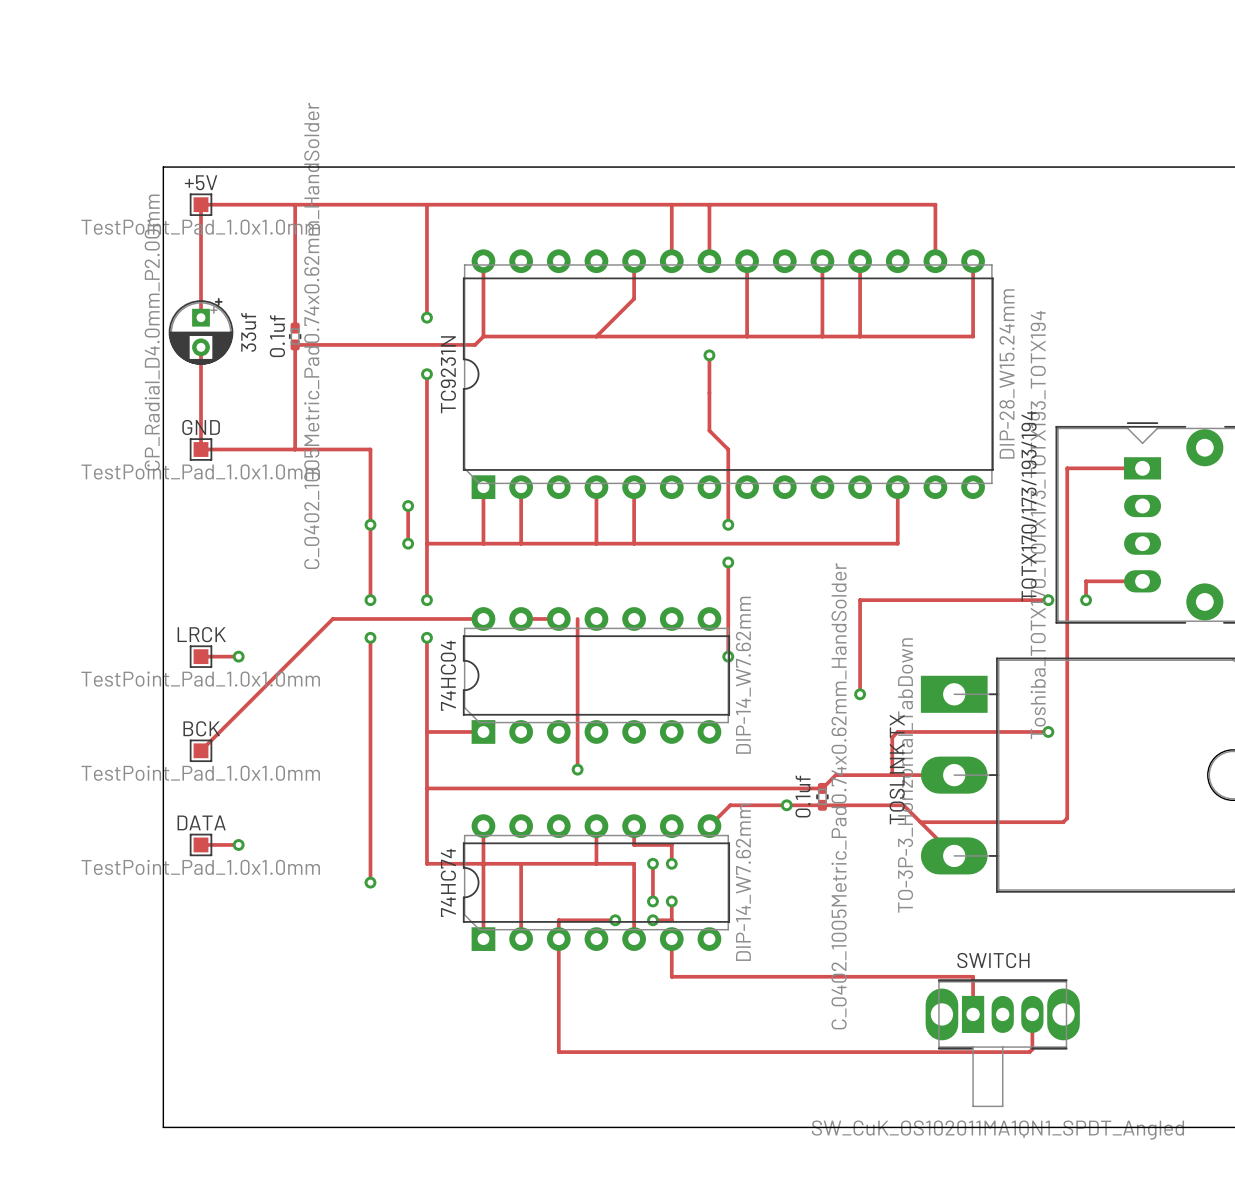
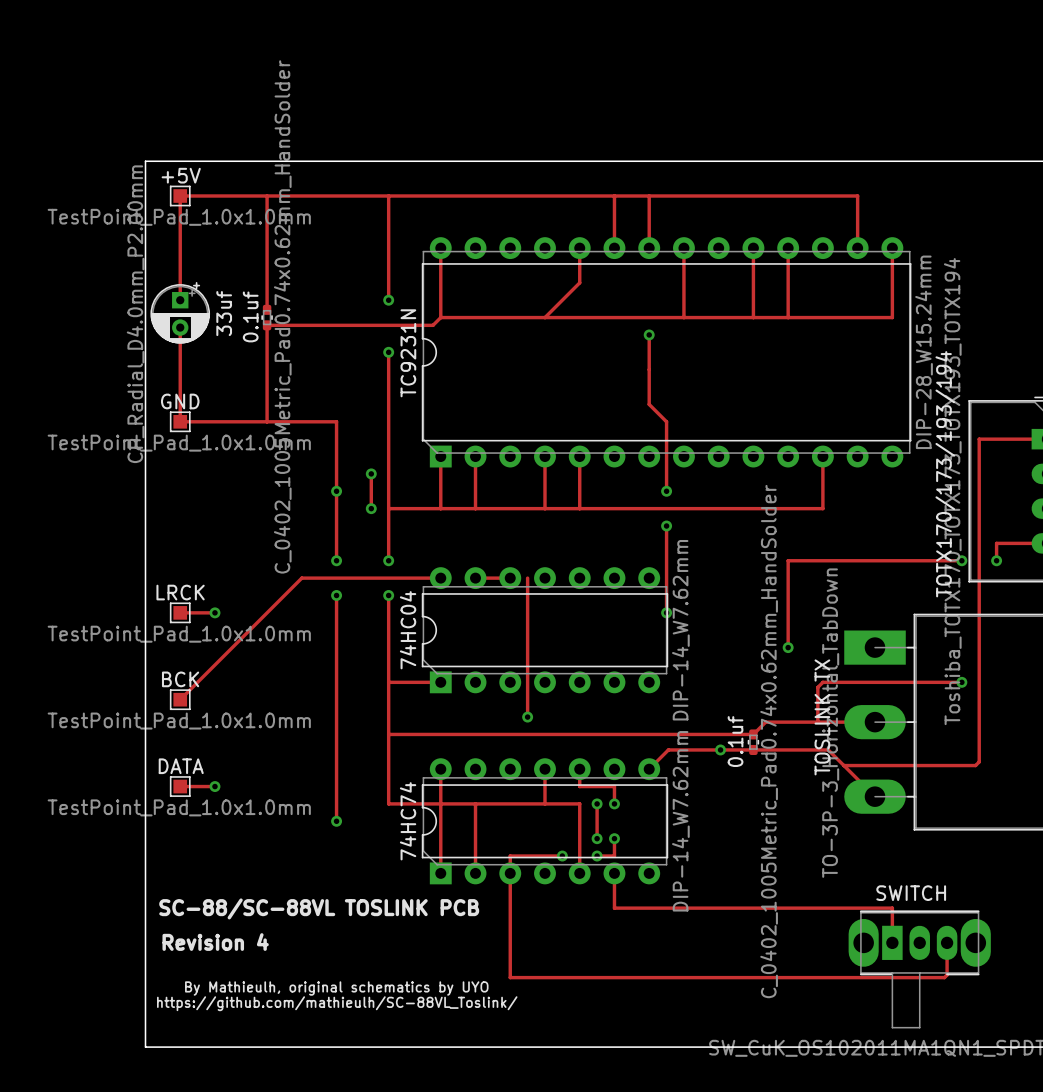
text: none -> SC-88/SC-88VL TOSLINK PCB (319, 908)
text: none -> Revision 4 (215, 942)
text: none -> By Mathieulh, original schematics by UYO (336, 988)
text: none -> https://github.com/mathieulh/SC-88VL_Toslink/ (337, 1003)

